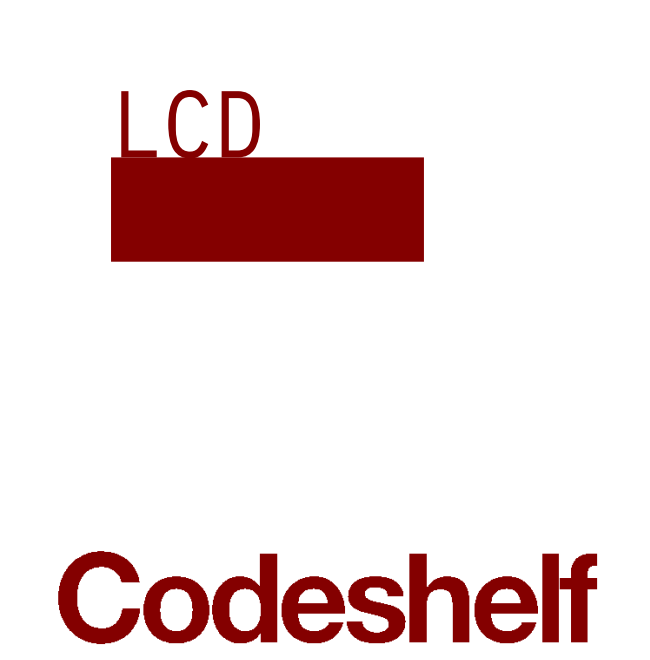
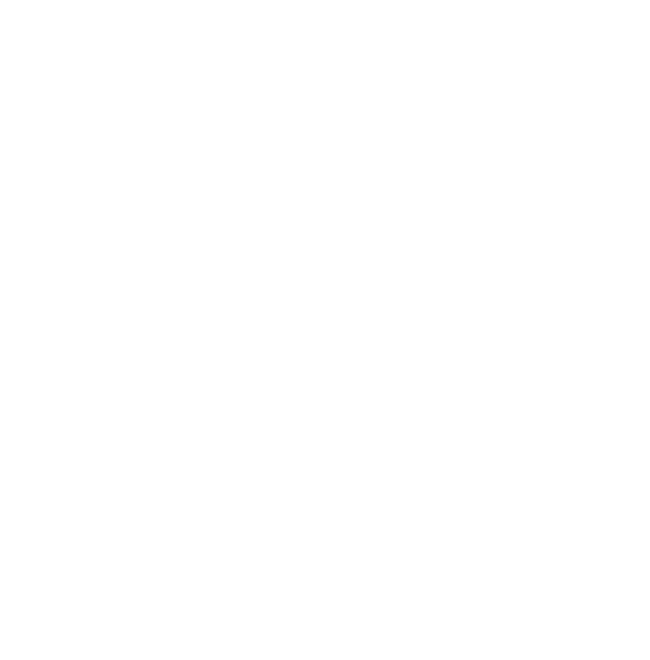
LCD: (267, 209) -> none
part: (327, 597) -> none

